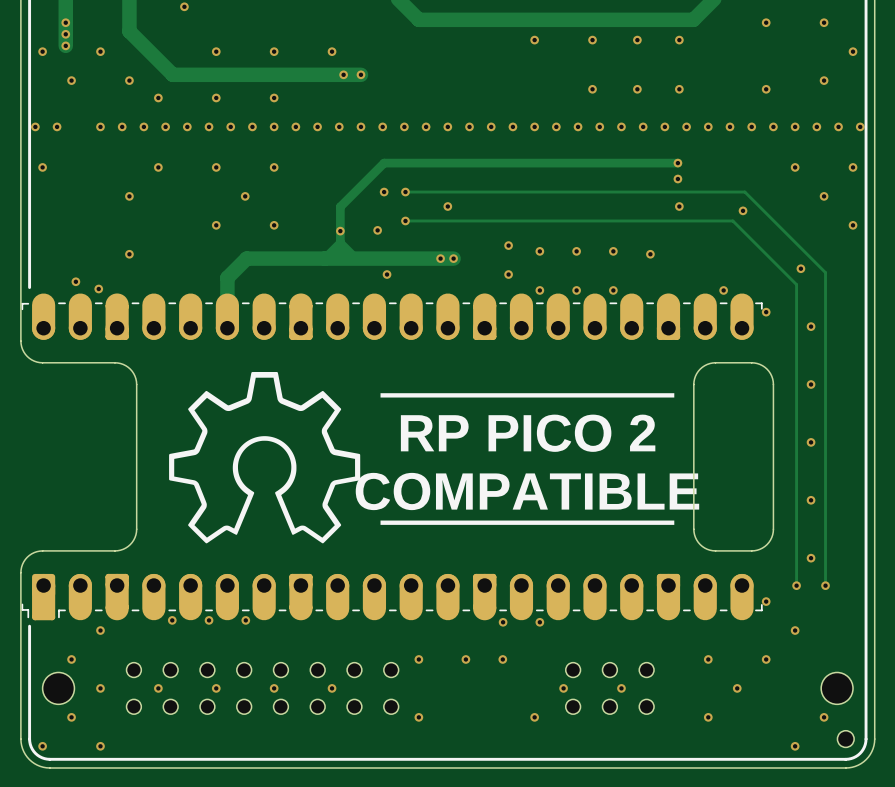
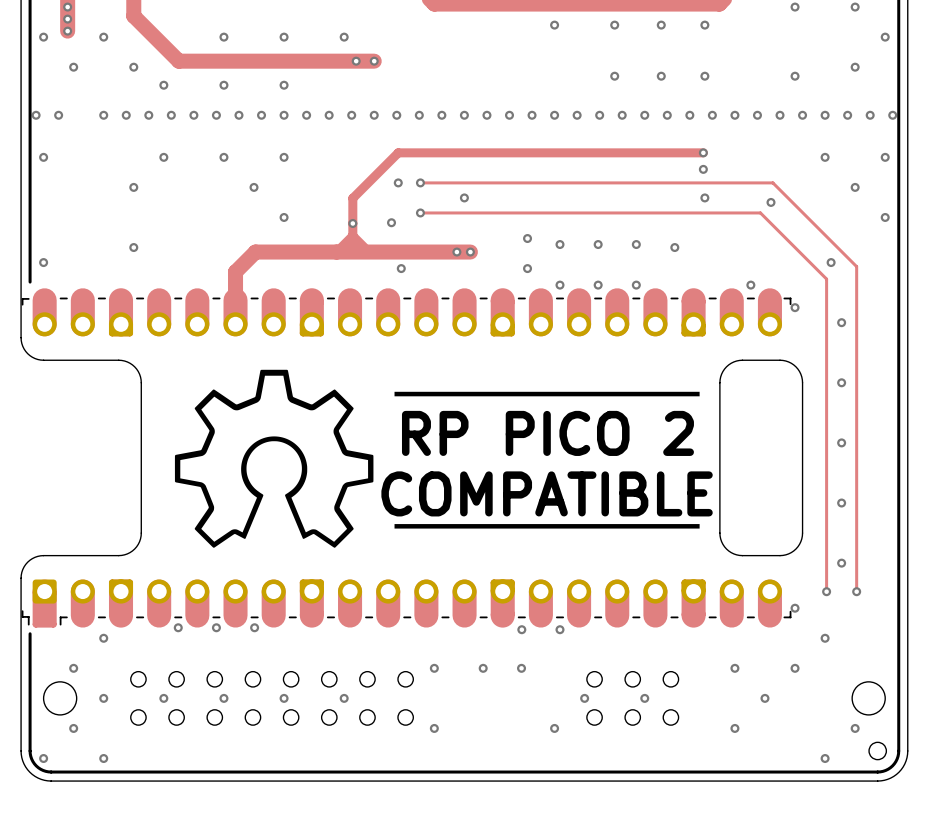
via: (216, 225) -> none
via: none -> (43, 262)
via: (75, 281) -> none
via: (98, 288) -> none

